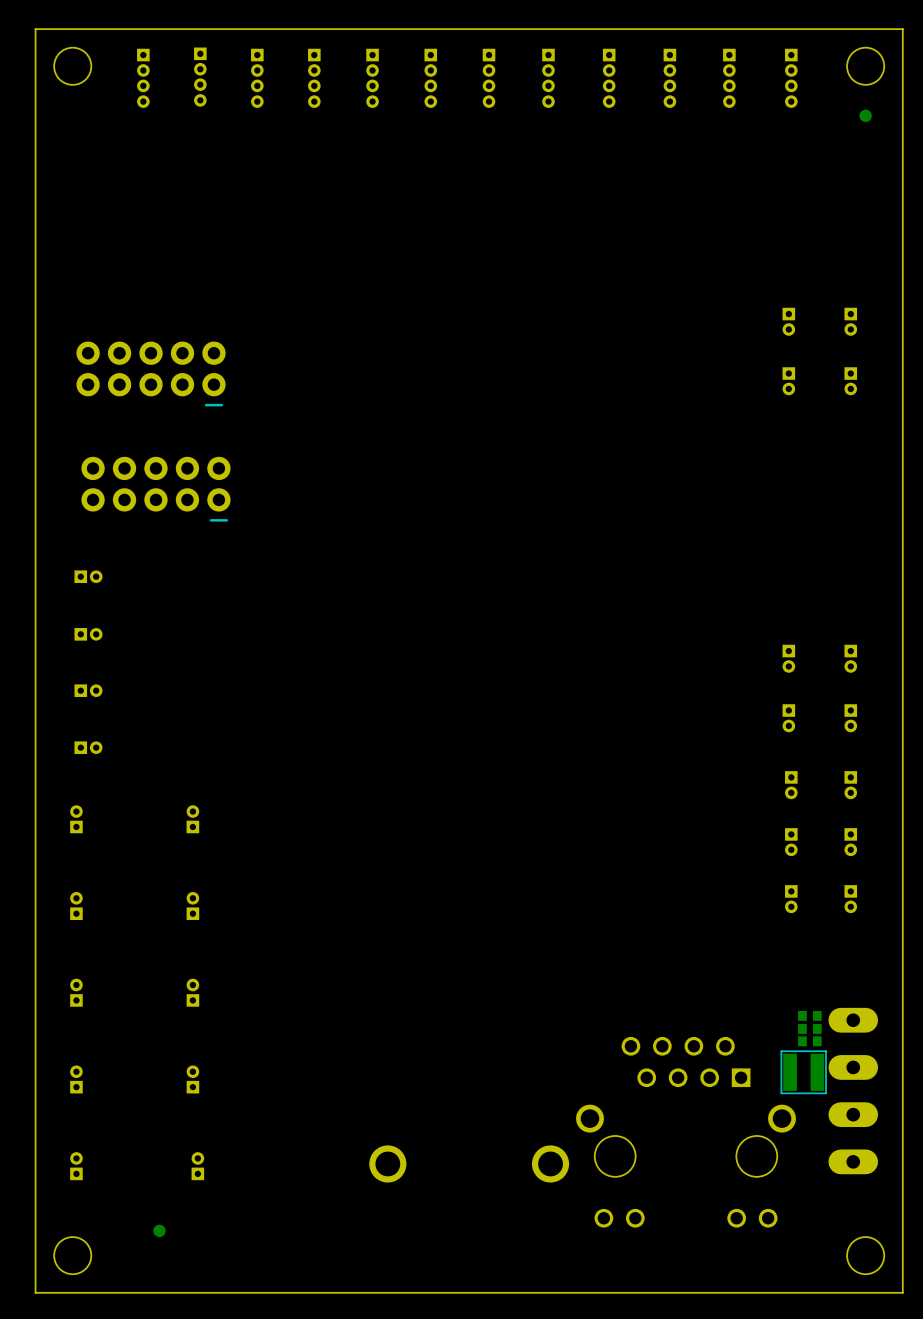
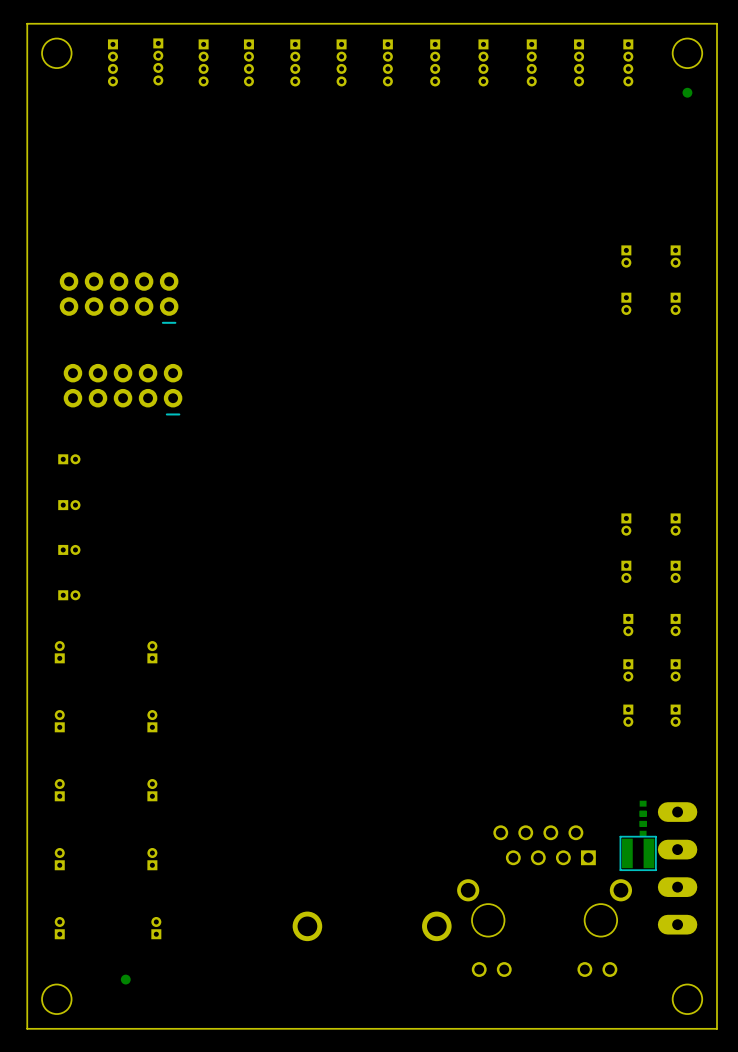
part footprint: [798, 1010, 822, 1021] -> [639, 800, 647, 817]
part footprint: [798, 1023, 822, 1034] -> [639, 811, 647, 827]
part footprint: [798, 1036, 822, 1047] -> [639, 820, 647, 837]

